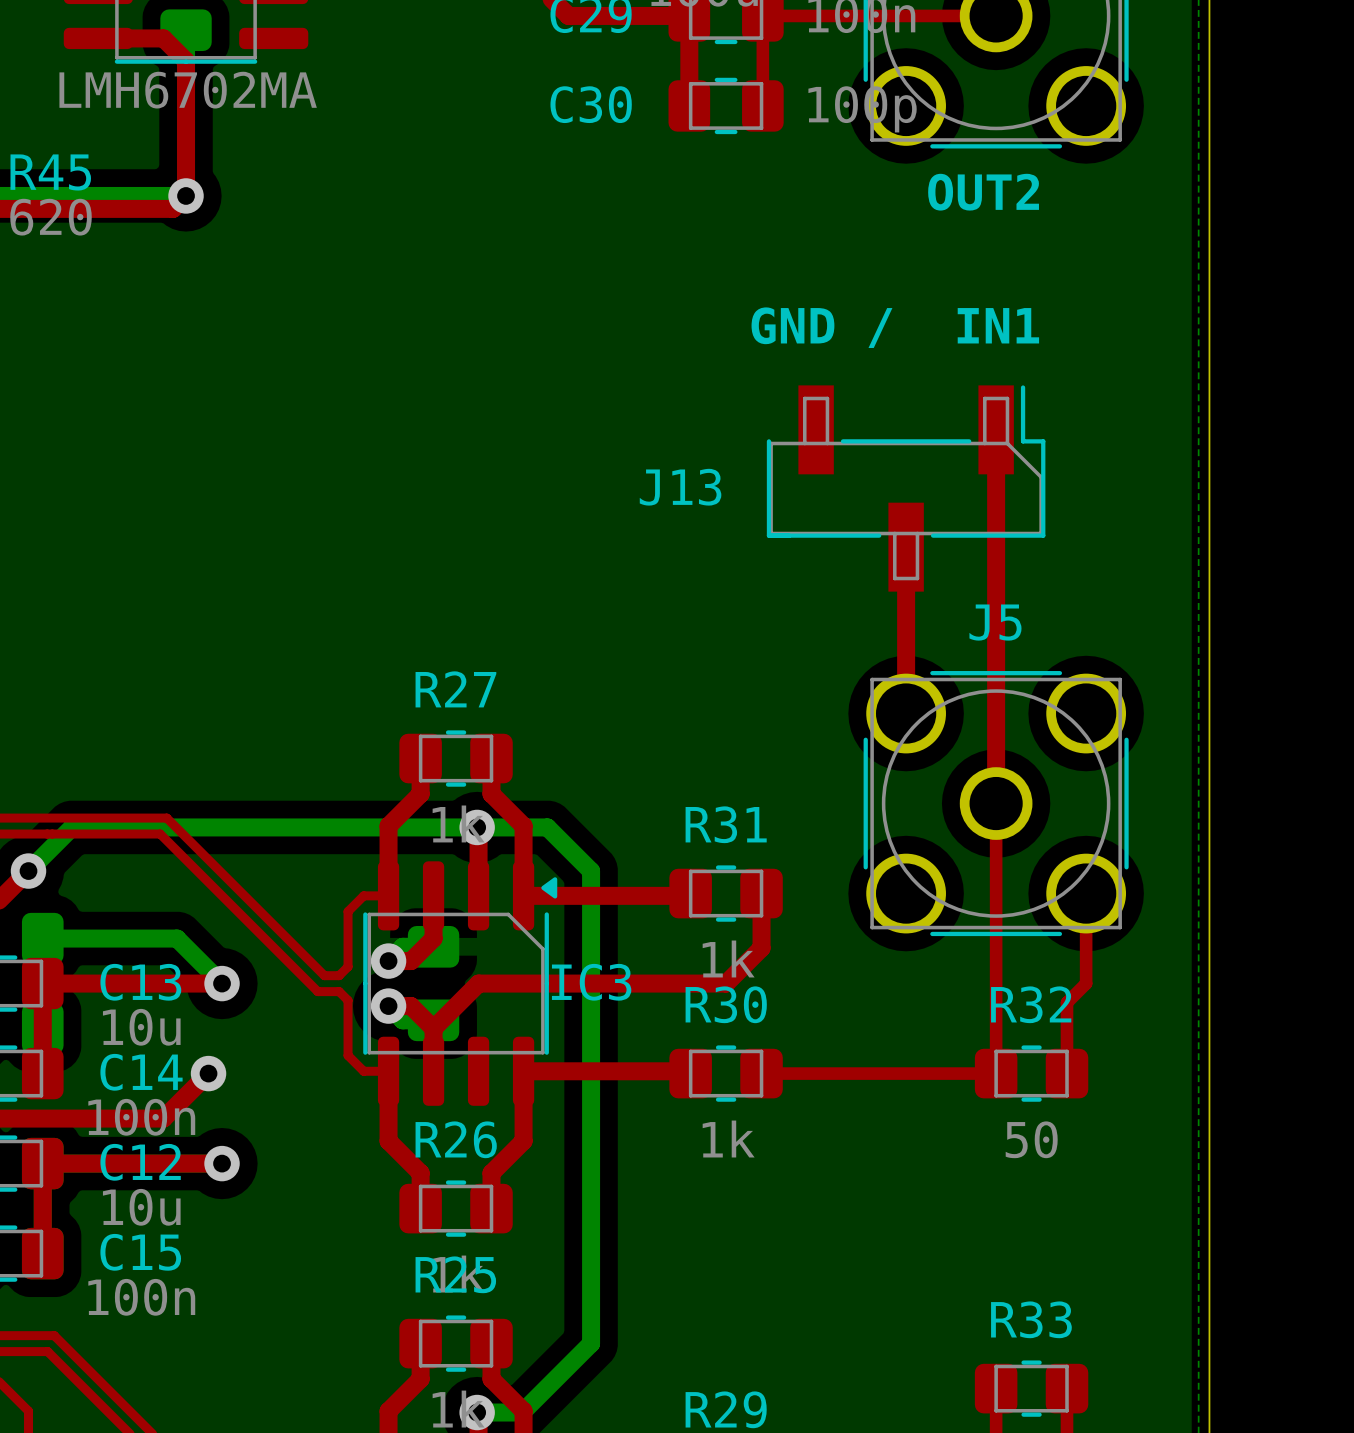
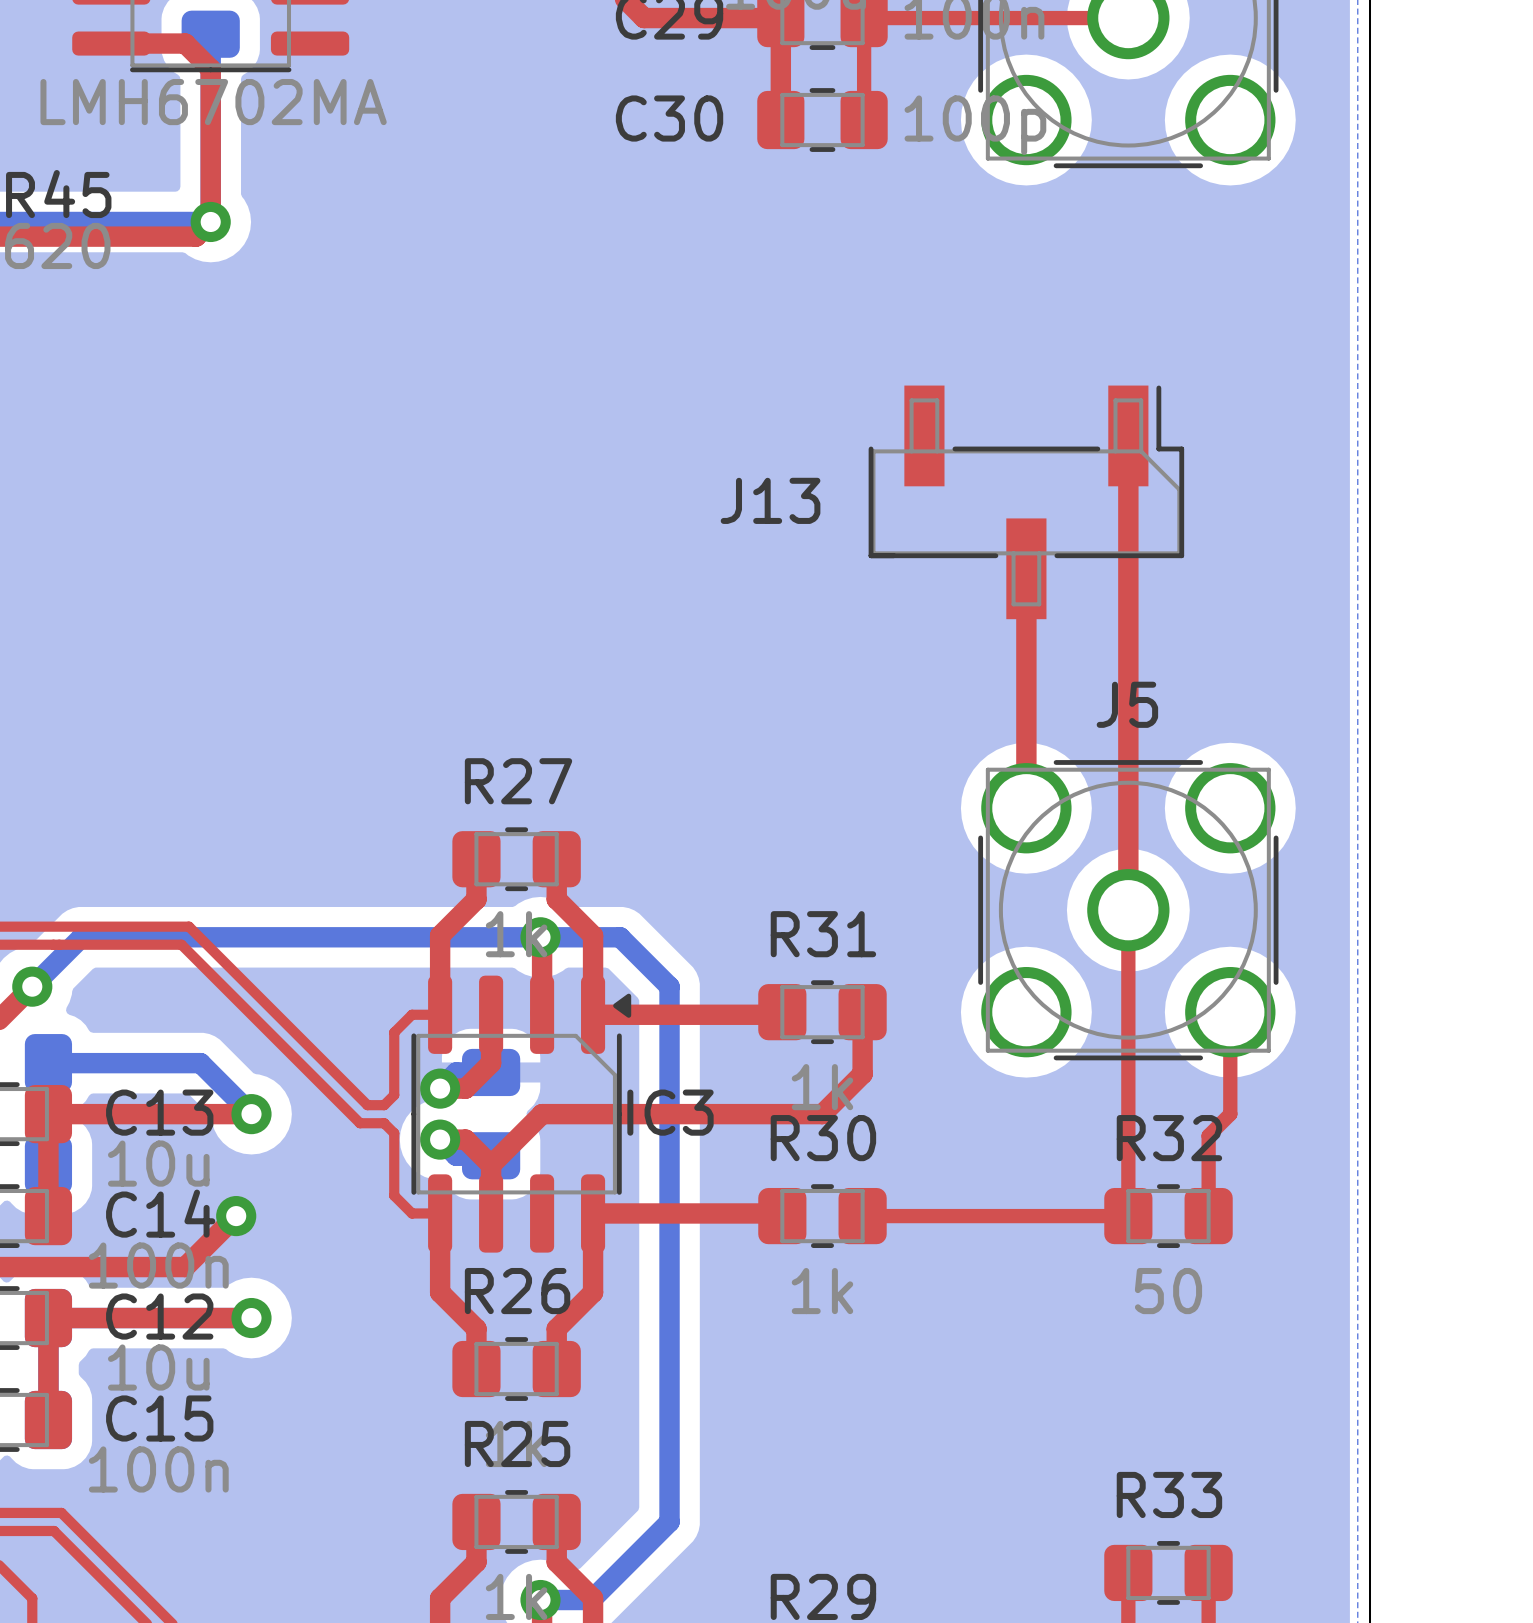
text: OUT2 (983, 192) -> none
text: GND / IN1 (895, 327) -> none
J13 position: (906, 488) -> (1026, 502)

